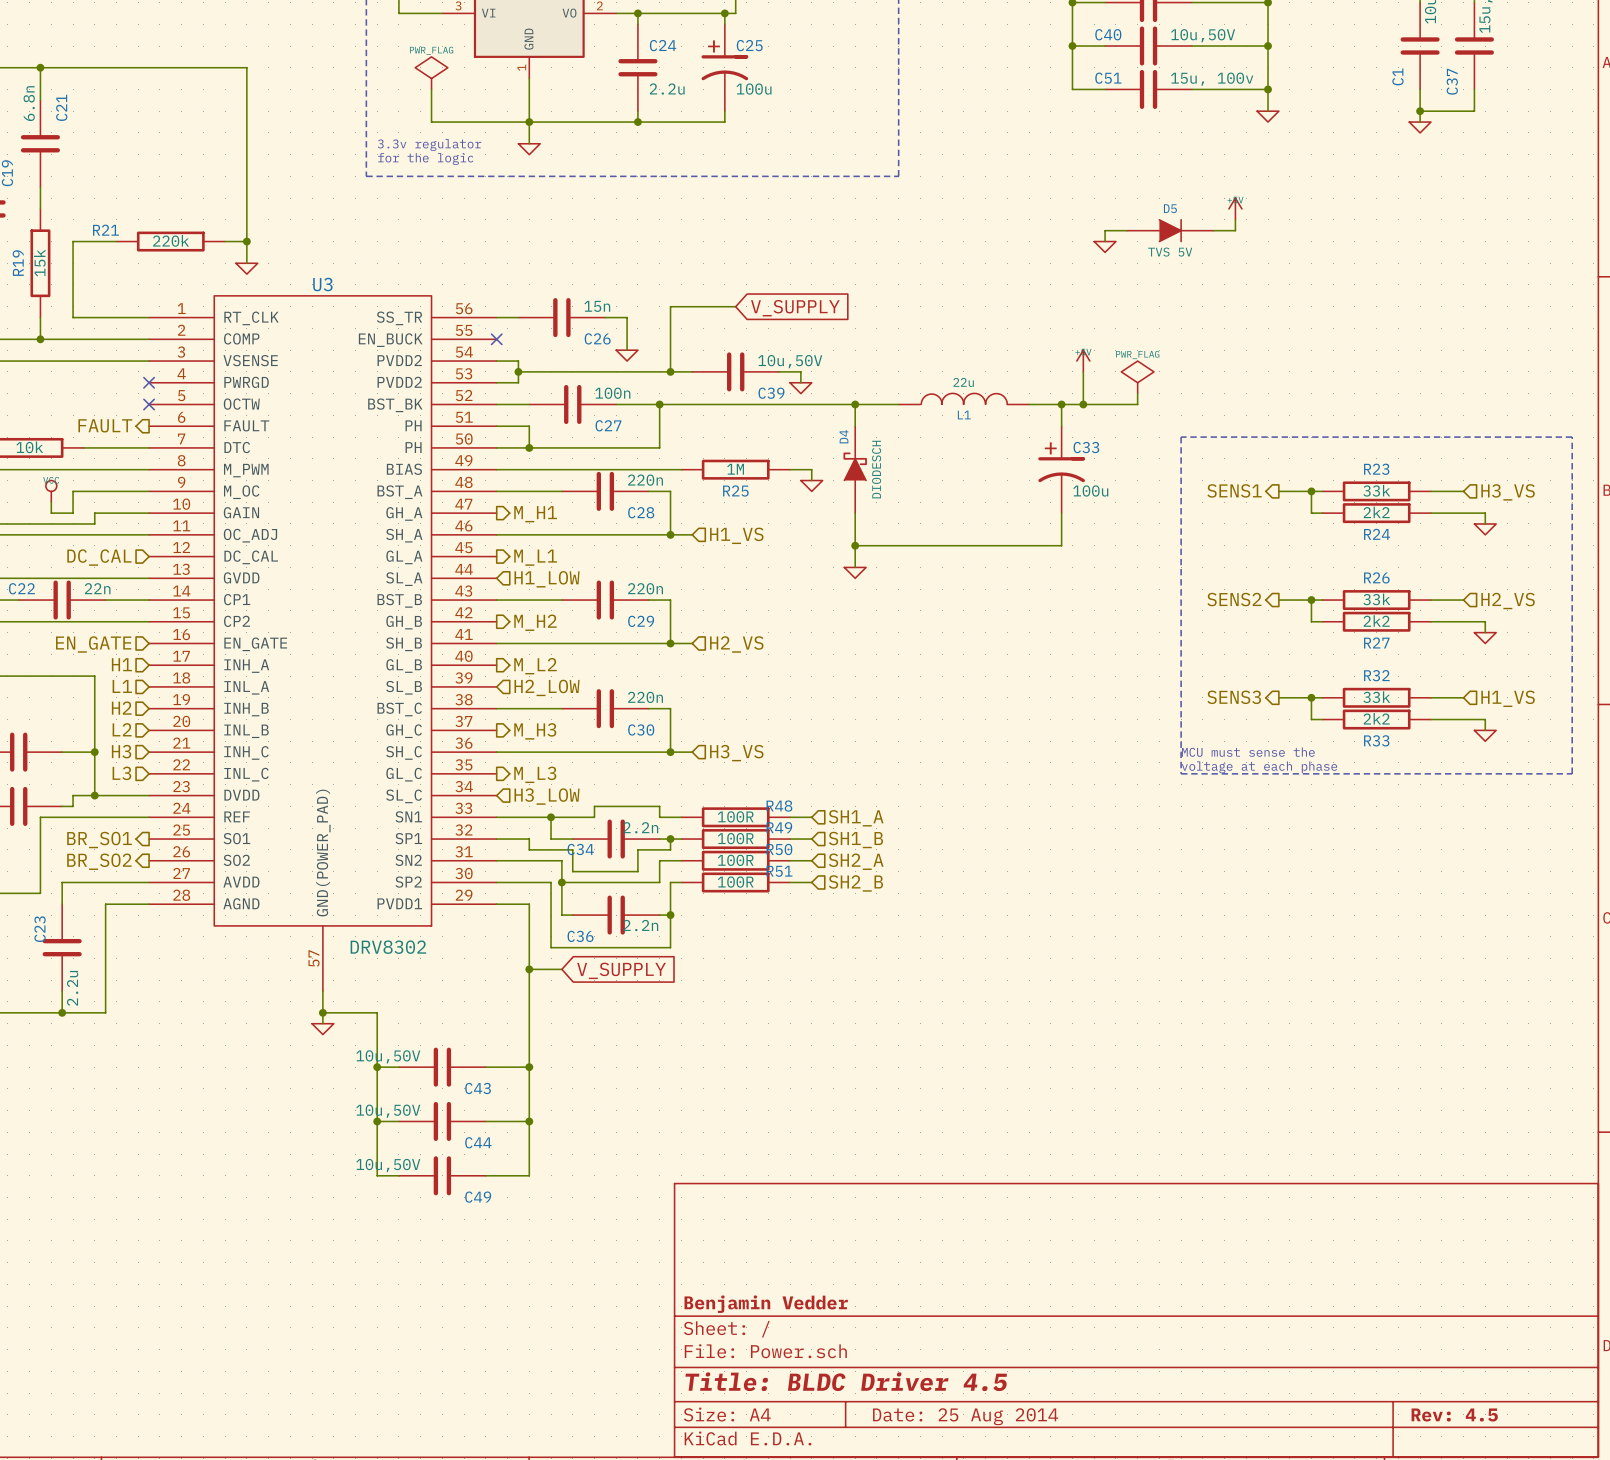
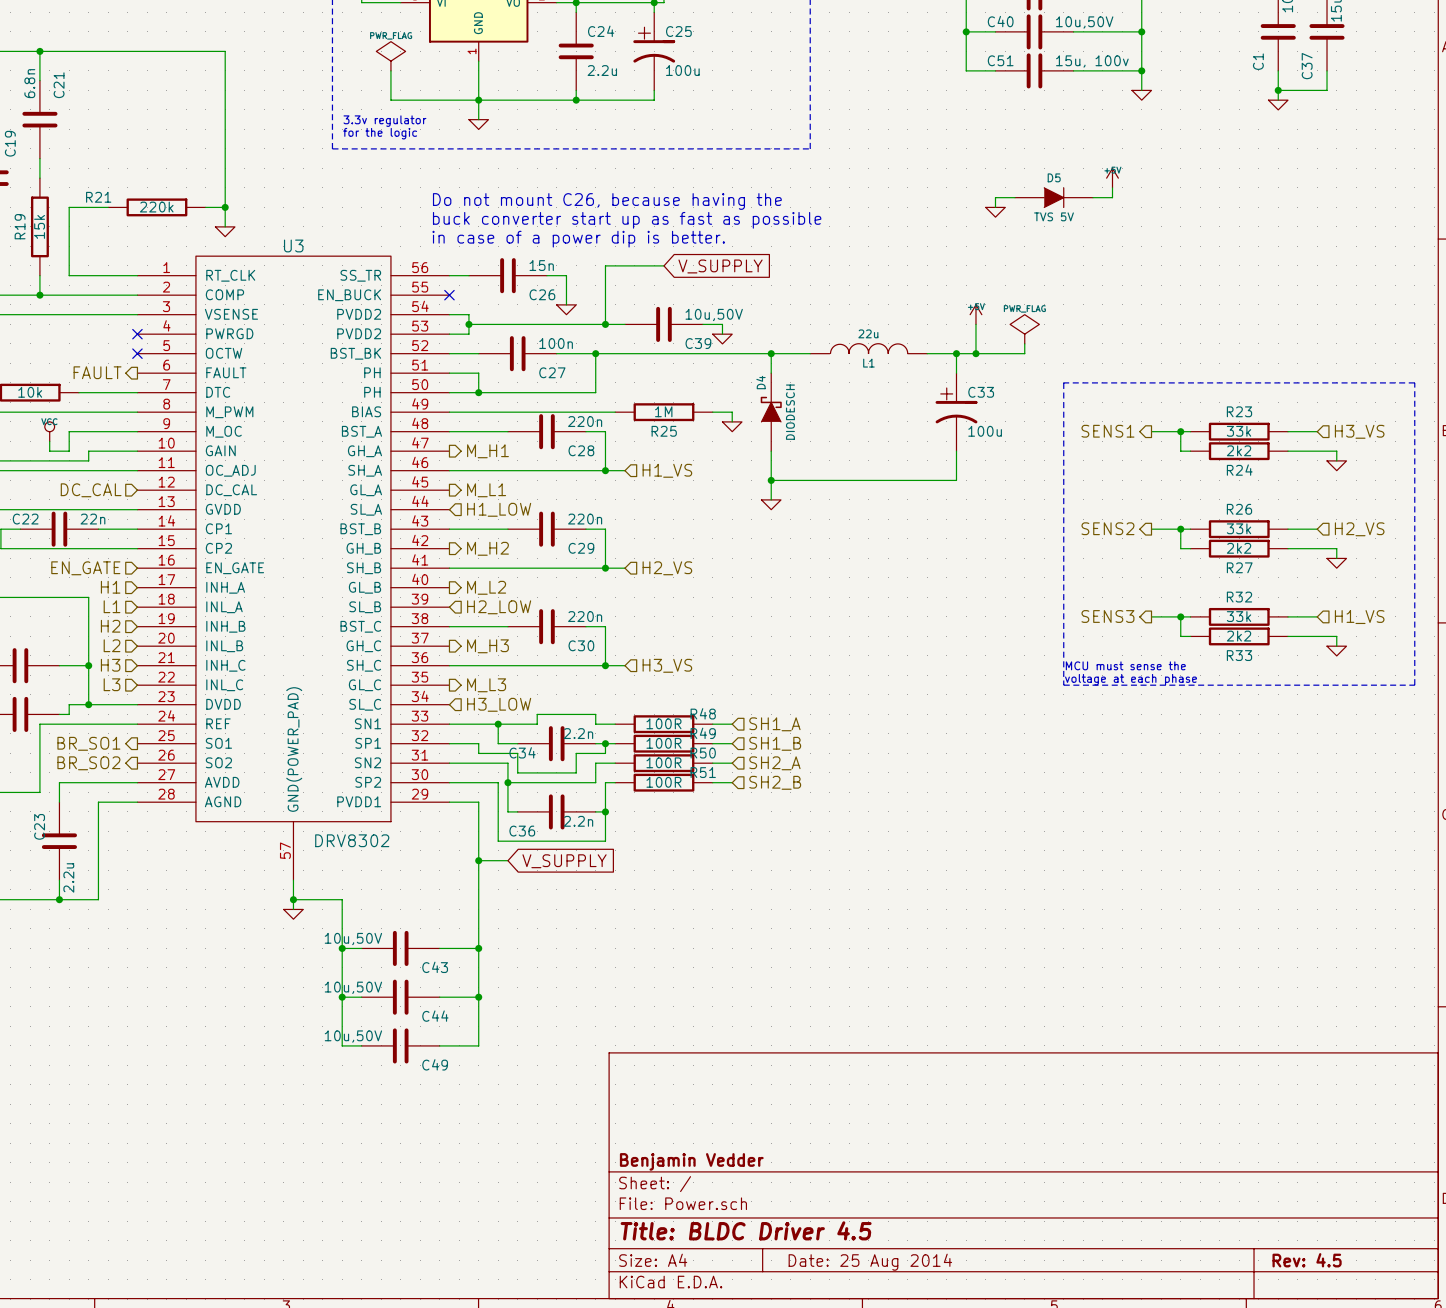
text: none -> Do not mount C26, because having the (607, 201)
text: none -> buck converter start up as fast as possible (627, 220)
text: none -> in case of a power dip is better. (578, 239)

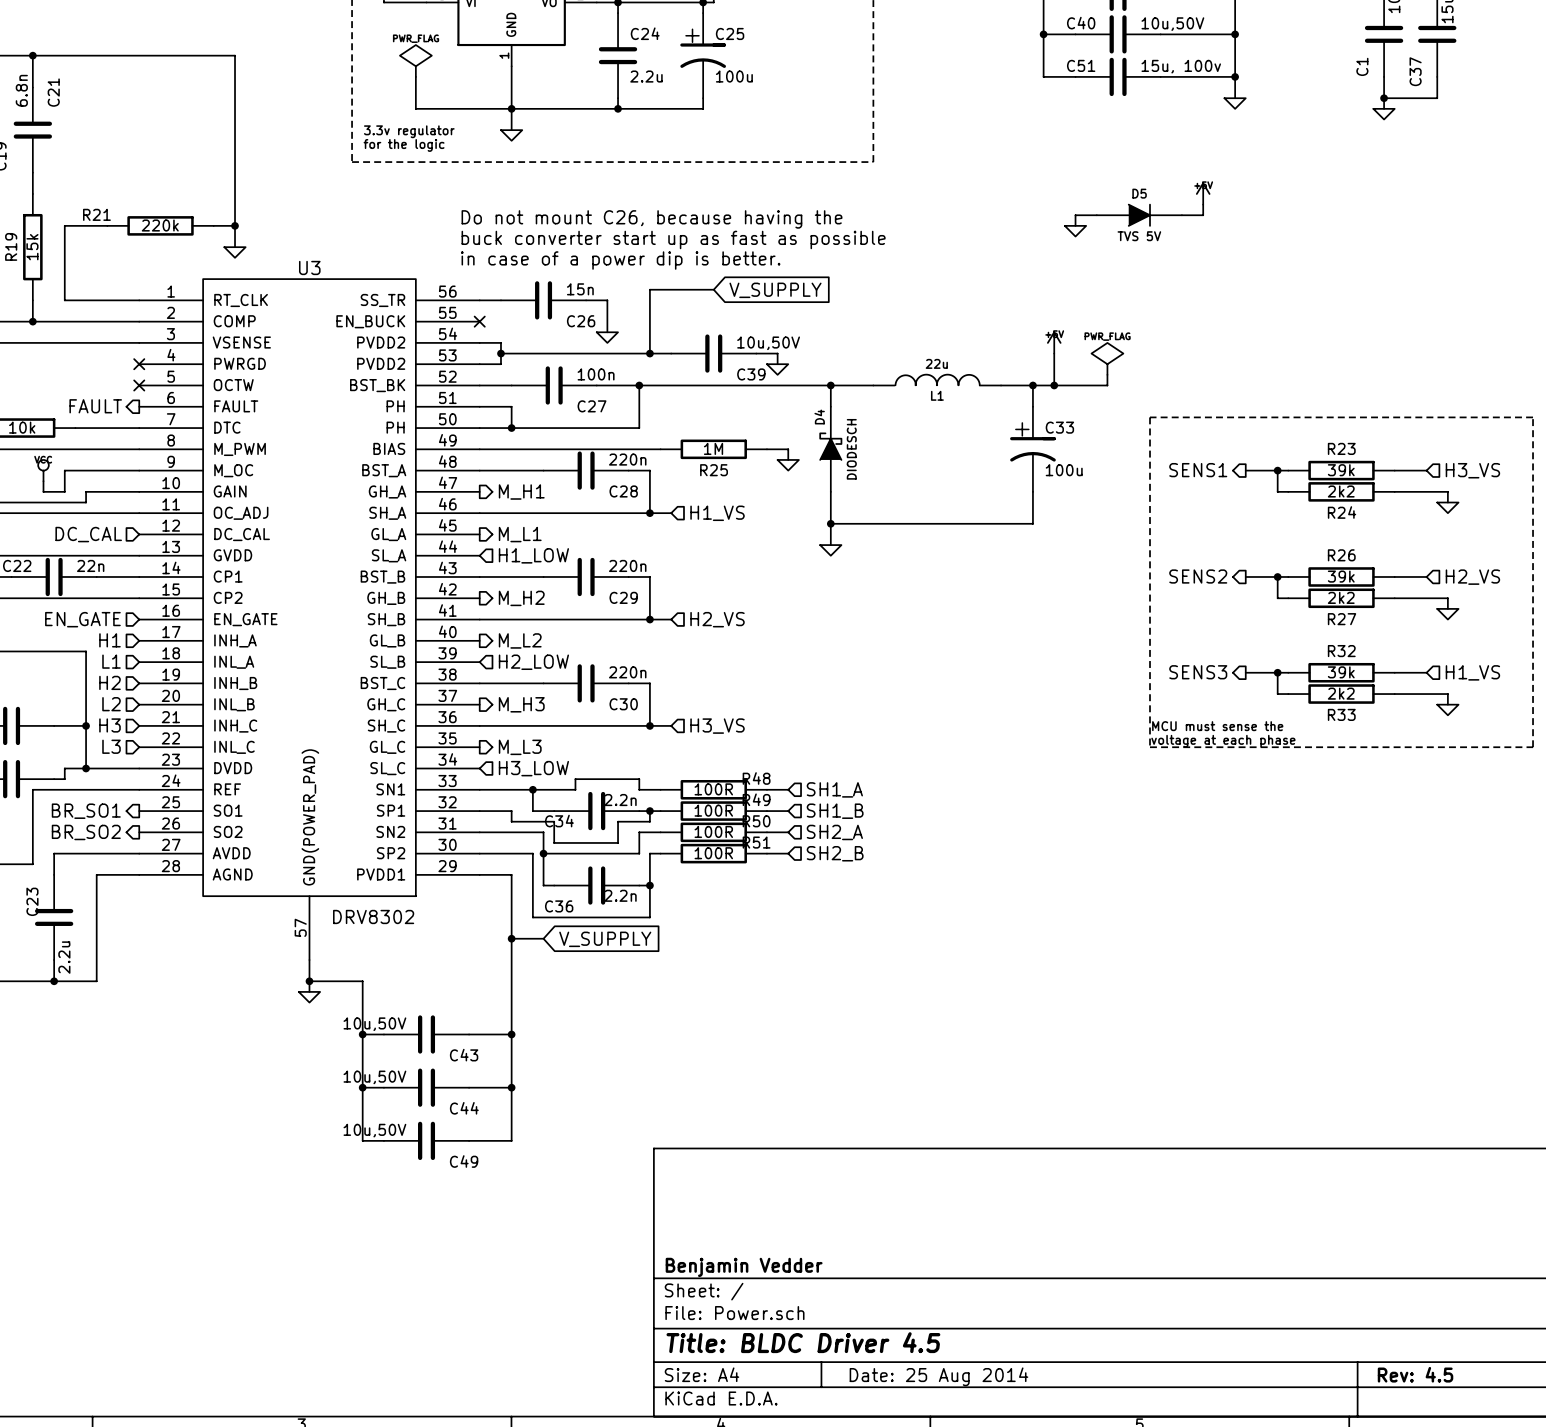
R23 value: 33k (1239, 431) -> 39k (1341, 470)
R26 value: 33k (1239, 528) -> 39k (1341, 576)
R32 value: 33k (1239, 616) -> 39k (1341, 672)

